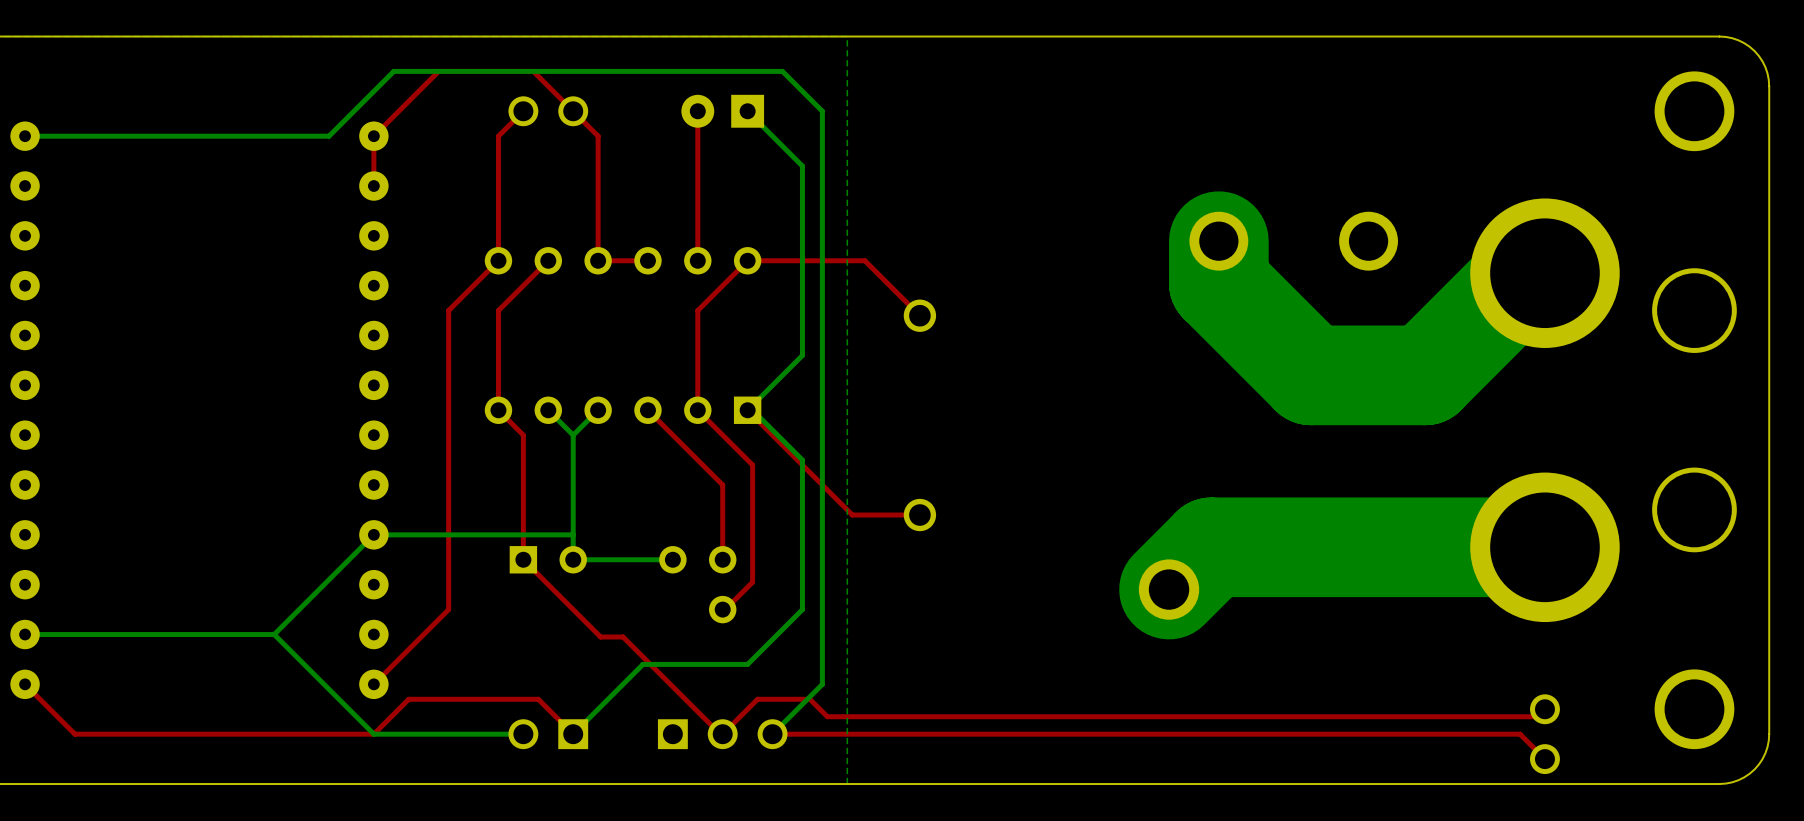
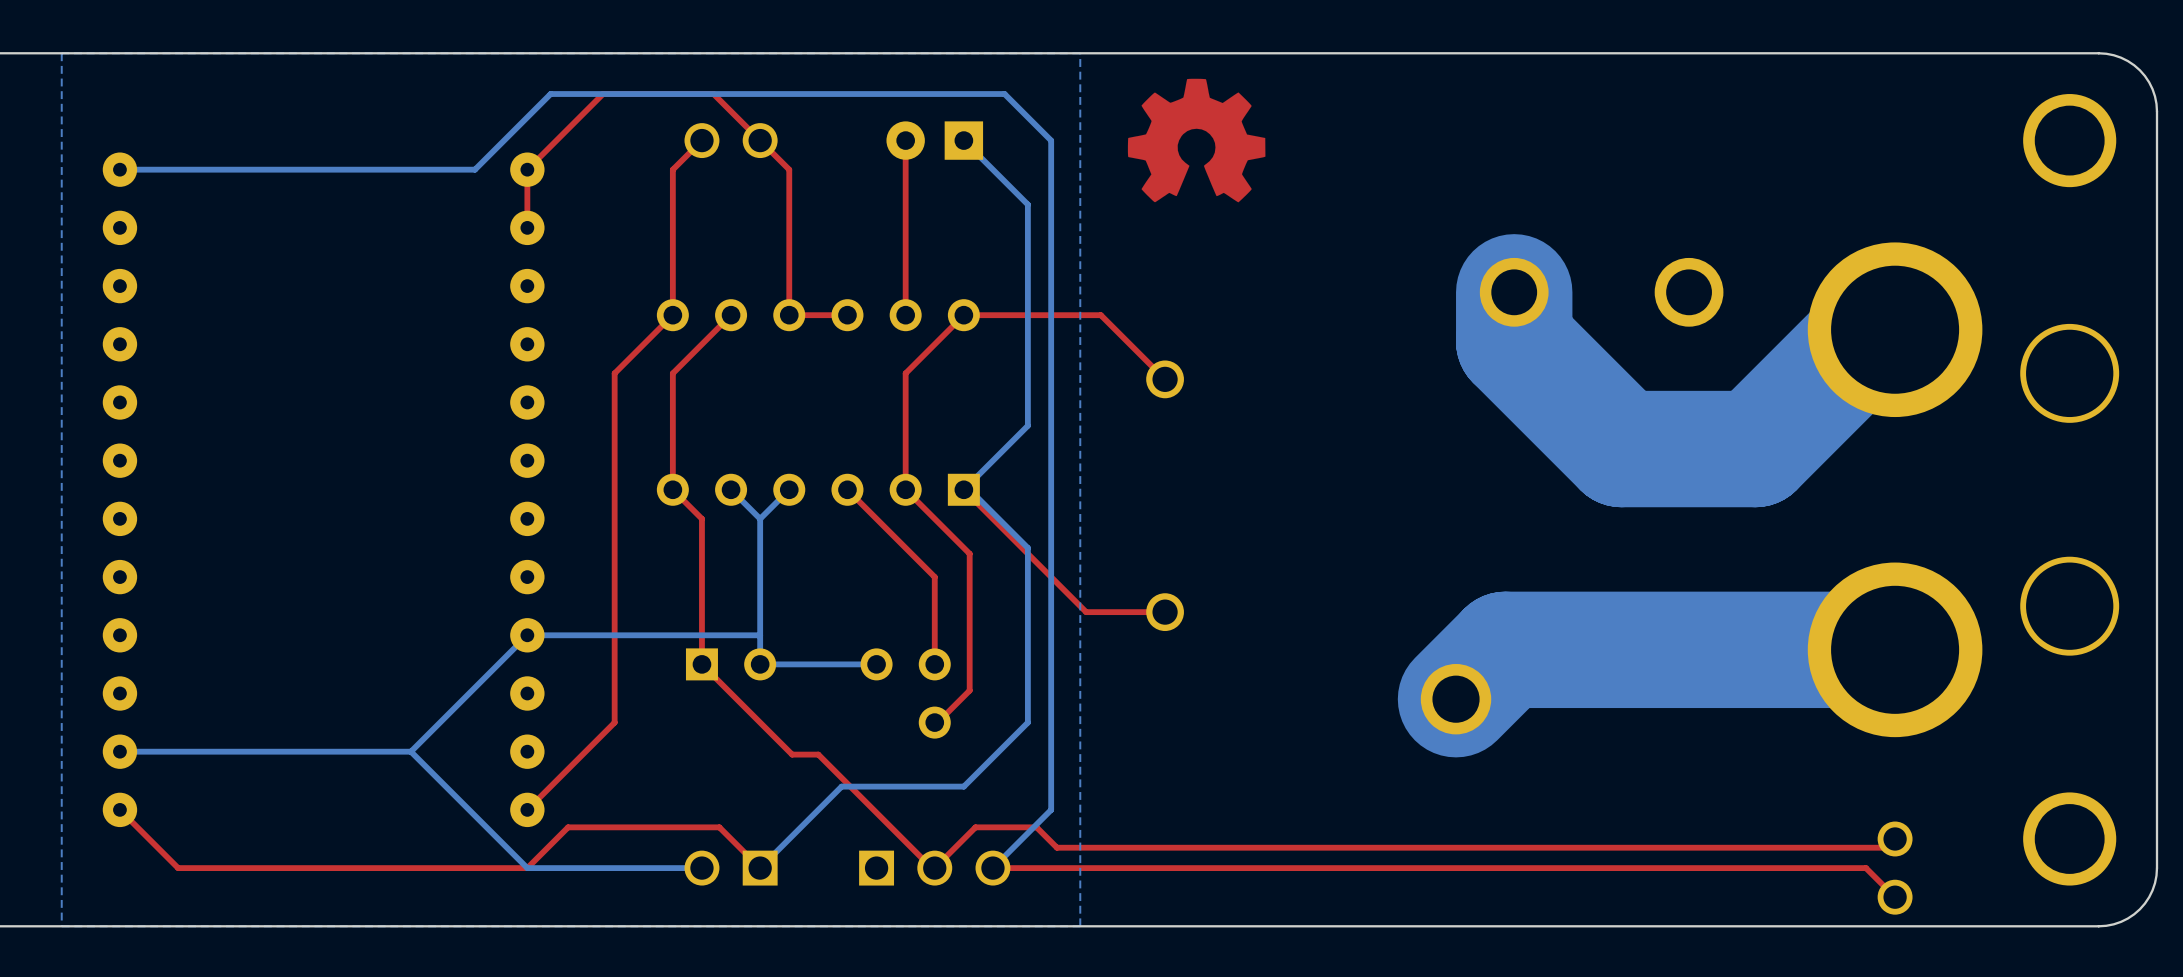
drawing: none -> [1127, 78, 1266, 203]

